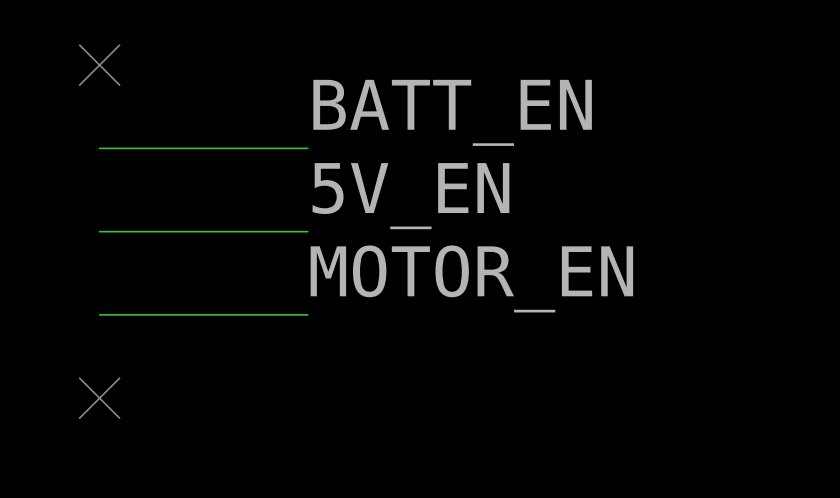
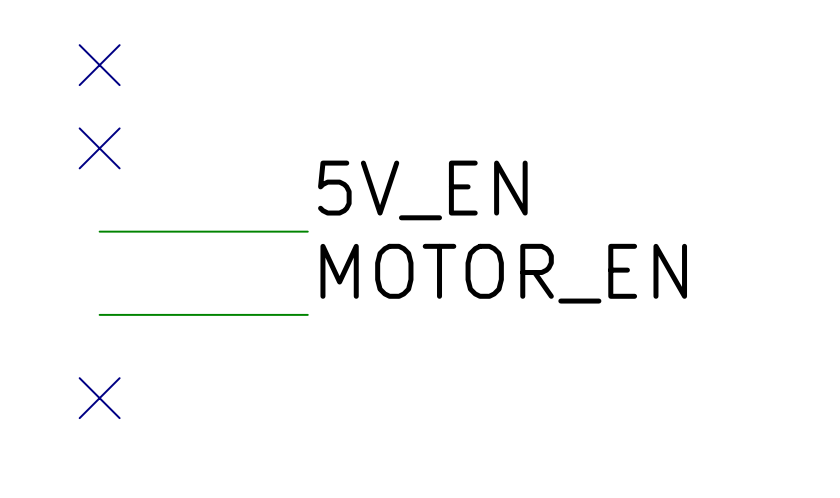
label: BATT_EN (452, 112) -> none
wire: (99, 148) (307, 148) -> none
no-connect mark: none -> (99, 148)

